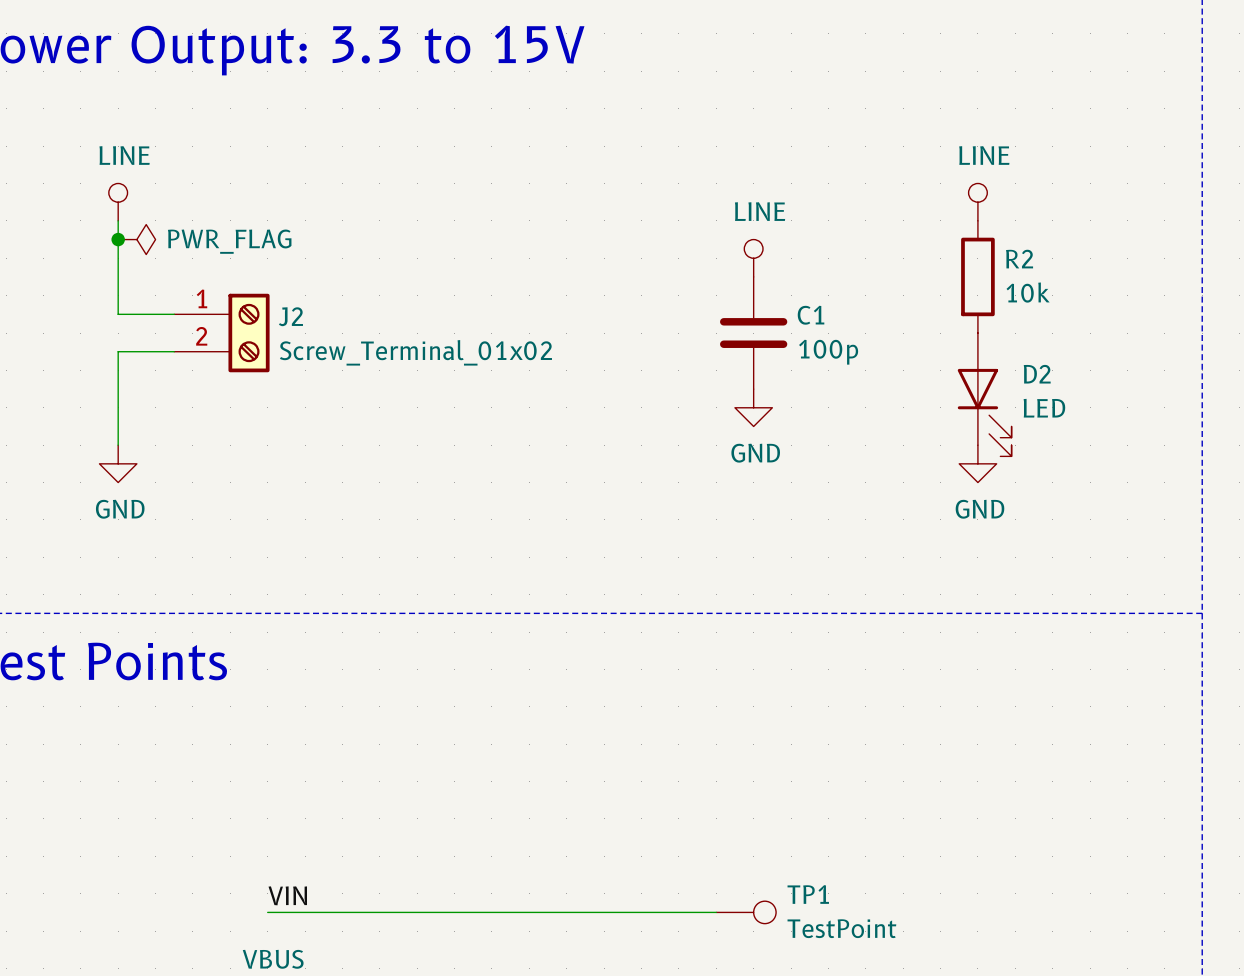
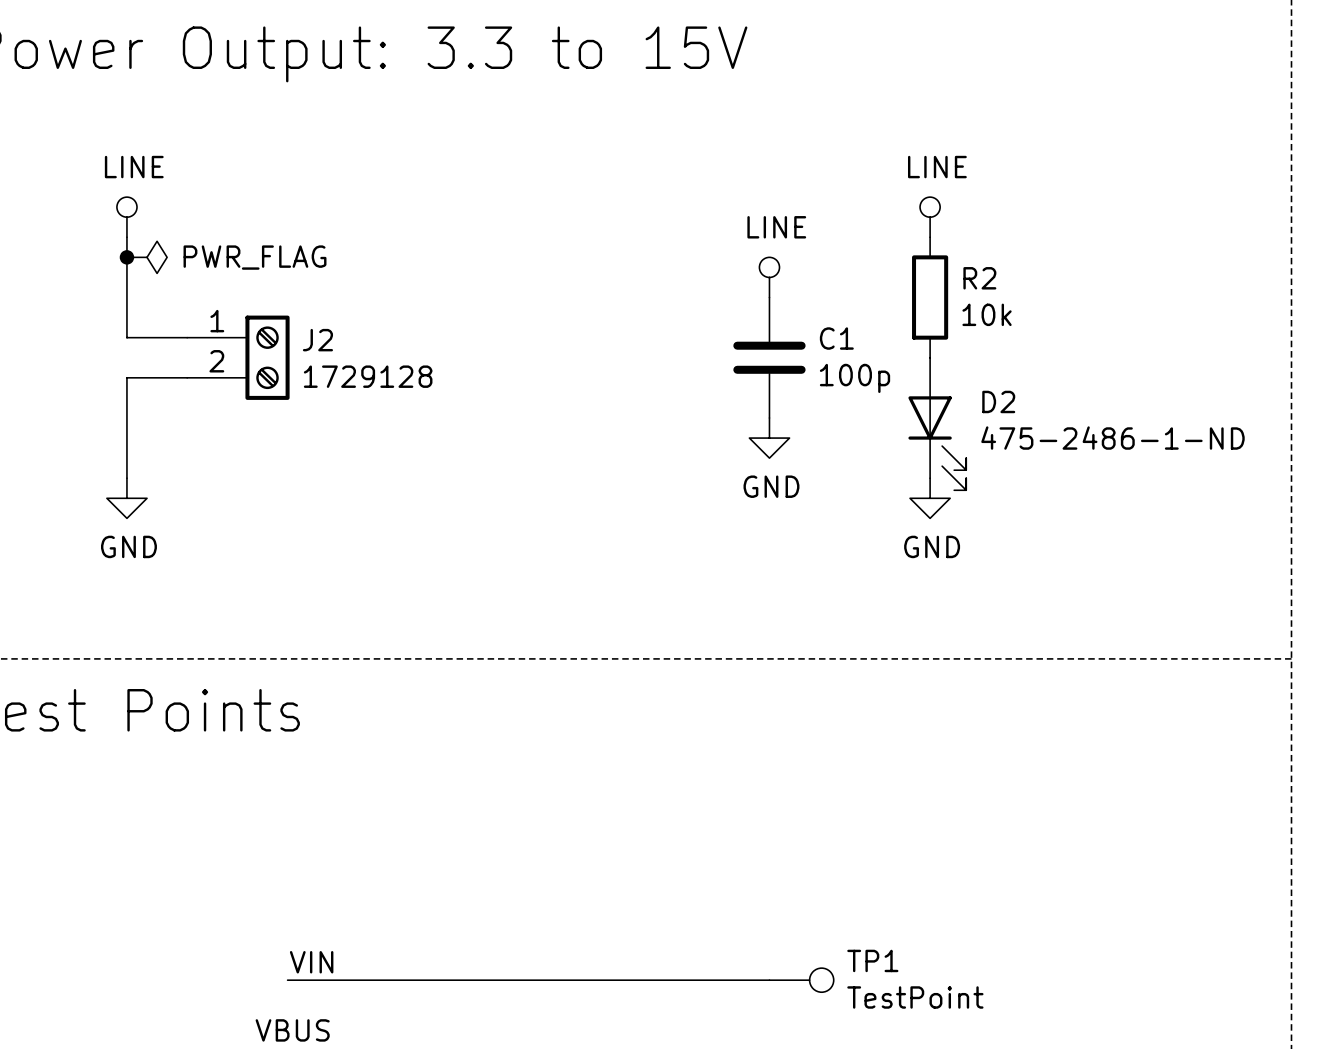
power symbol: none -> LINE (930, 217)
power symbol: LINE (977, 202) -> none
power symbol position: LINE (753, 258) -> LINE (769, 277)
R2 position: (977, 276) -> (930, 297)
C1 position: (753, 333) -> (769, 357)
J2 value: Screw_Terminal_01x02 (415, 352) -> 1729128 (368, 376)
D2 position: (984, 394) -> (937, 424)
power symbol position: GND (753, 407) -> GND (769, 438)
D2 value: LED (1044, 408) -> 475-2486-1-ND (1112, 438)
power symbol: none -> GND (930, 498)
power symbol: GND (977, 463) -> none

